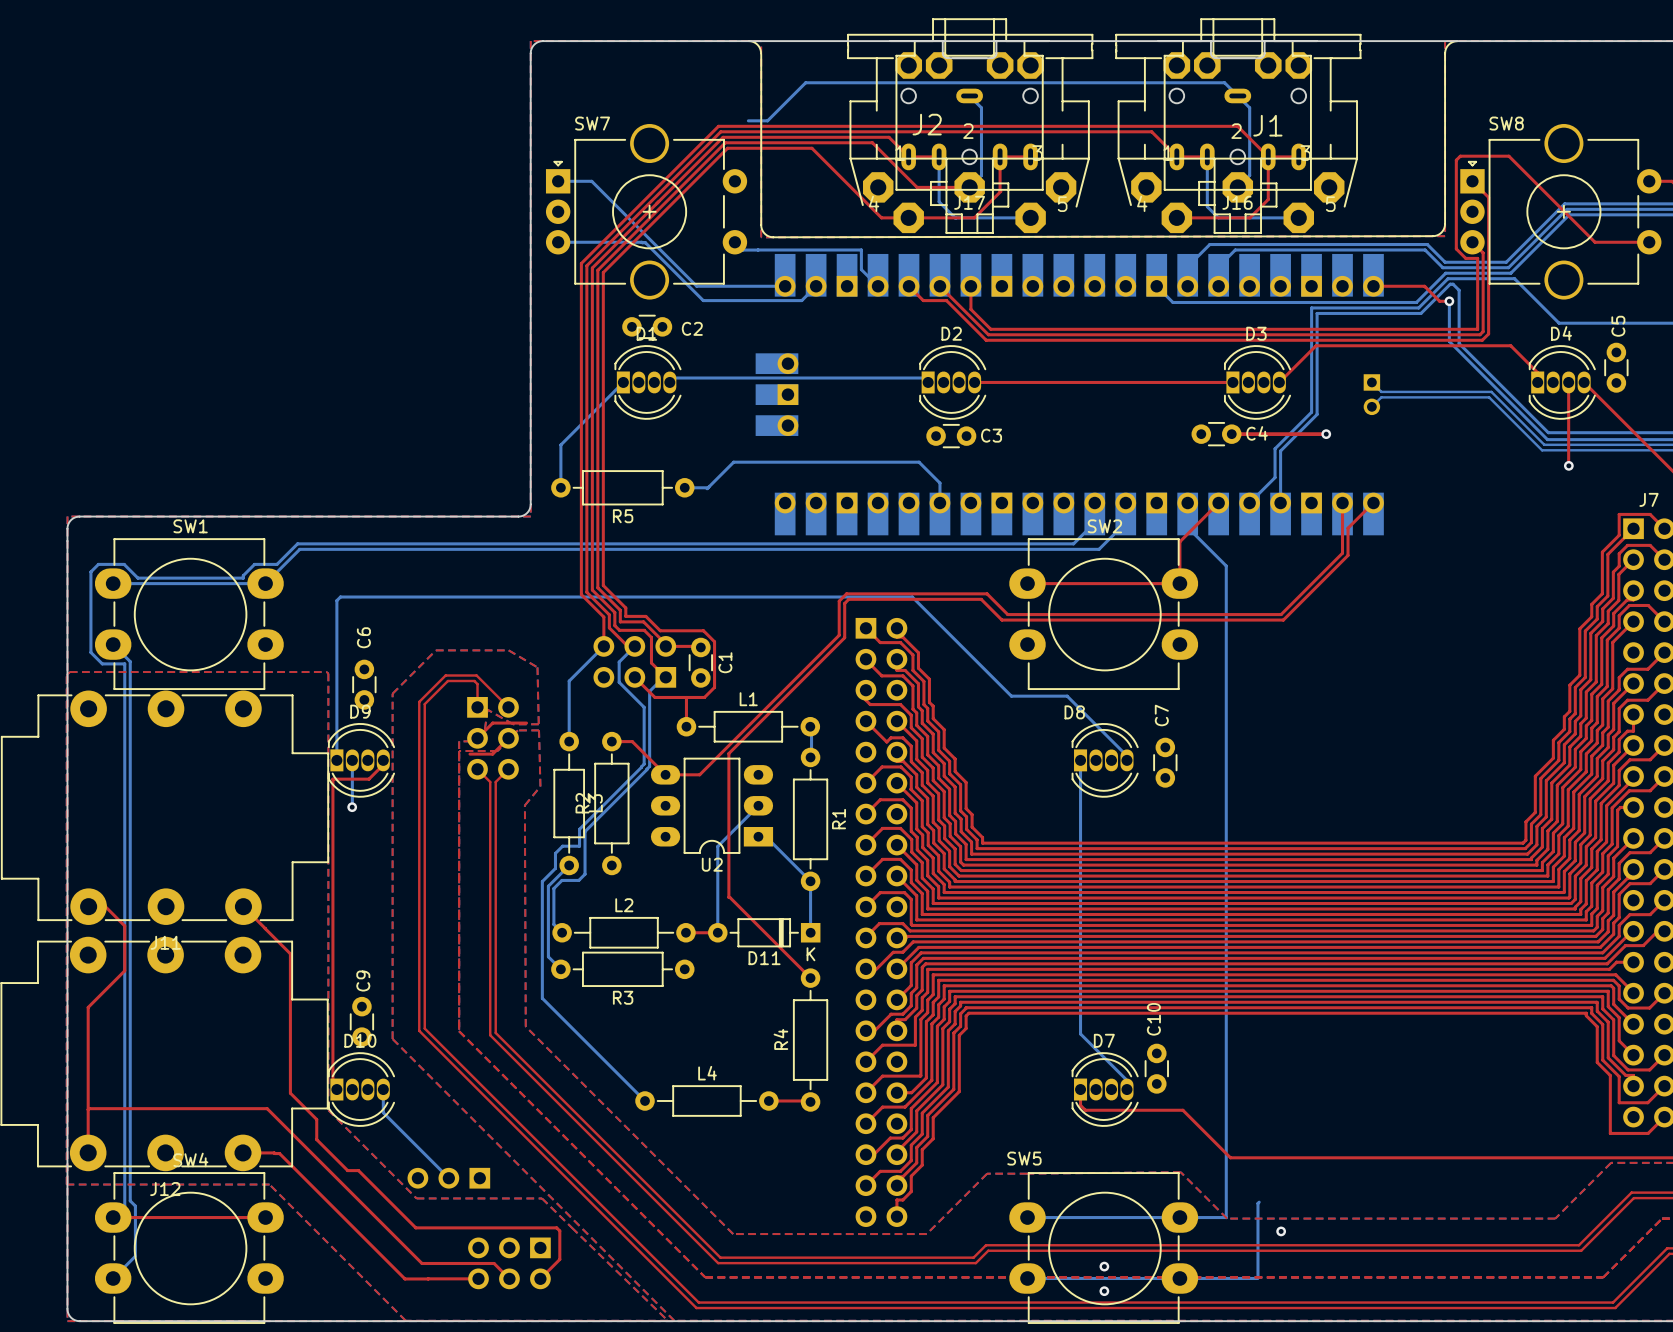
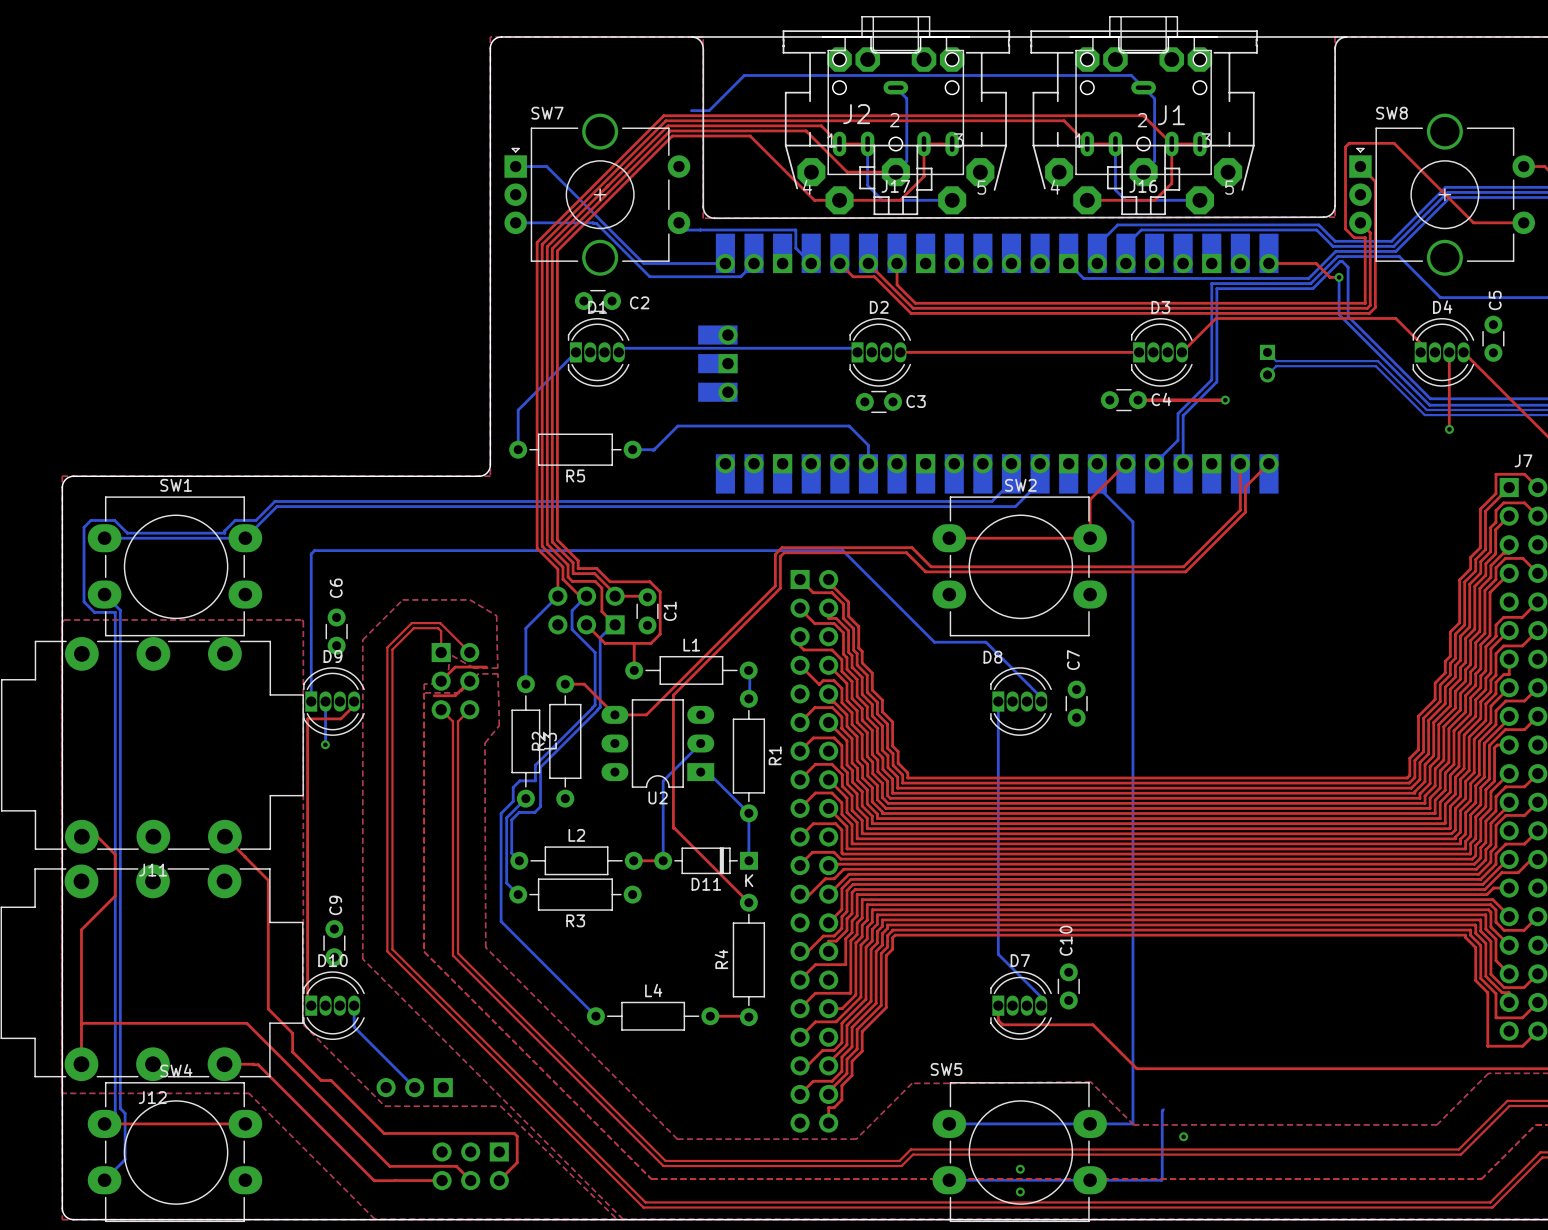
J17 footprint: [889, 18, 1050, 191] -> [821, 16, 970, 176]
J16 footprint: [1157, 18, 1318, 191] -> [1069, 16, 1218, 176]

